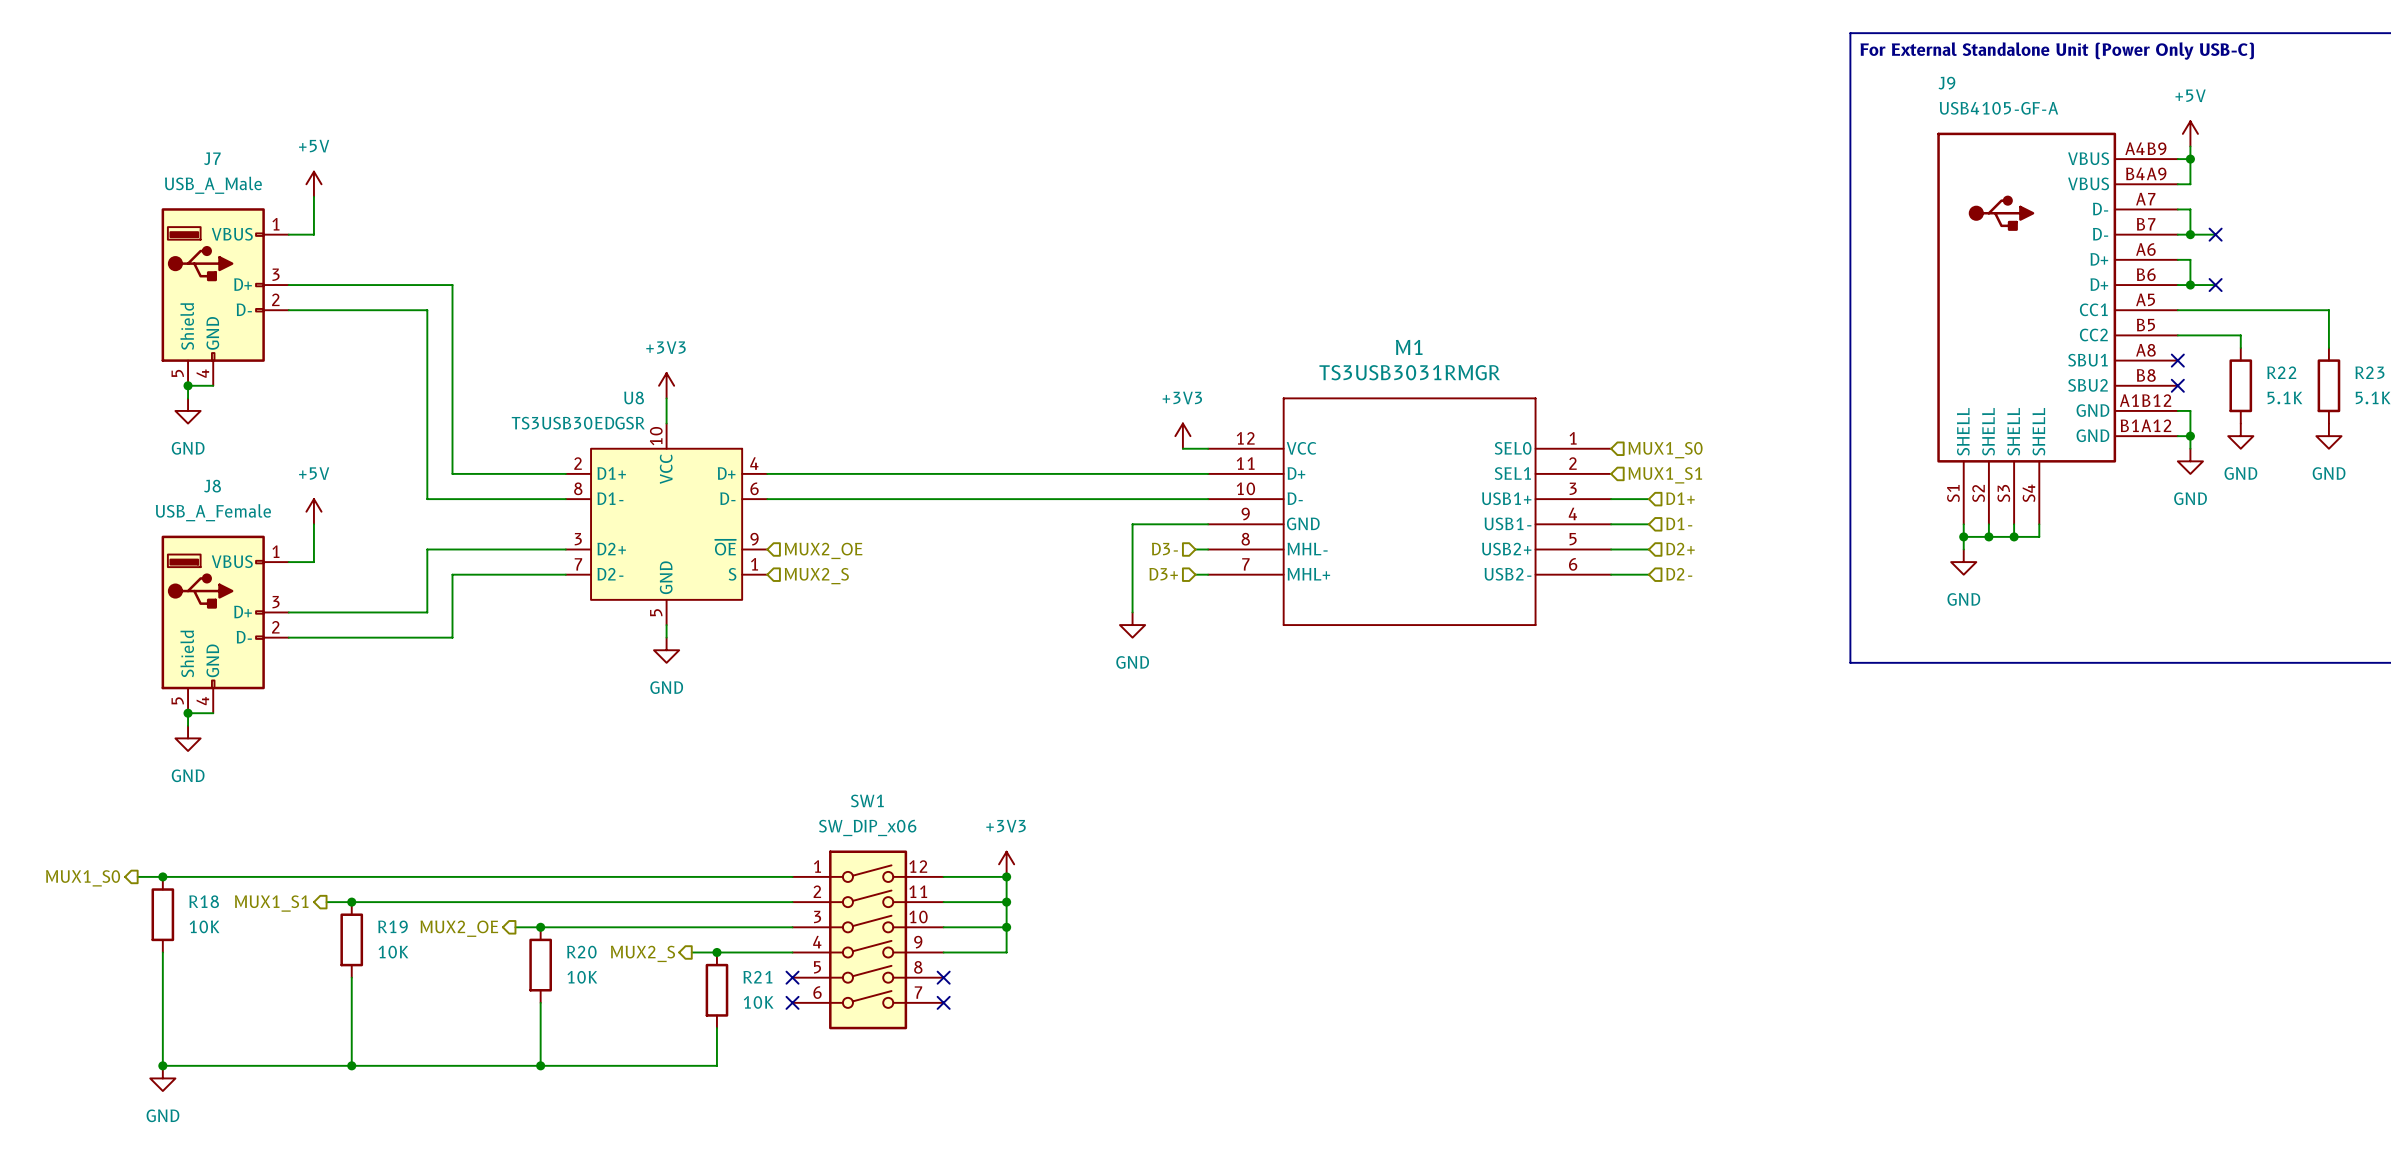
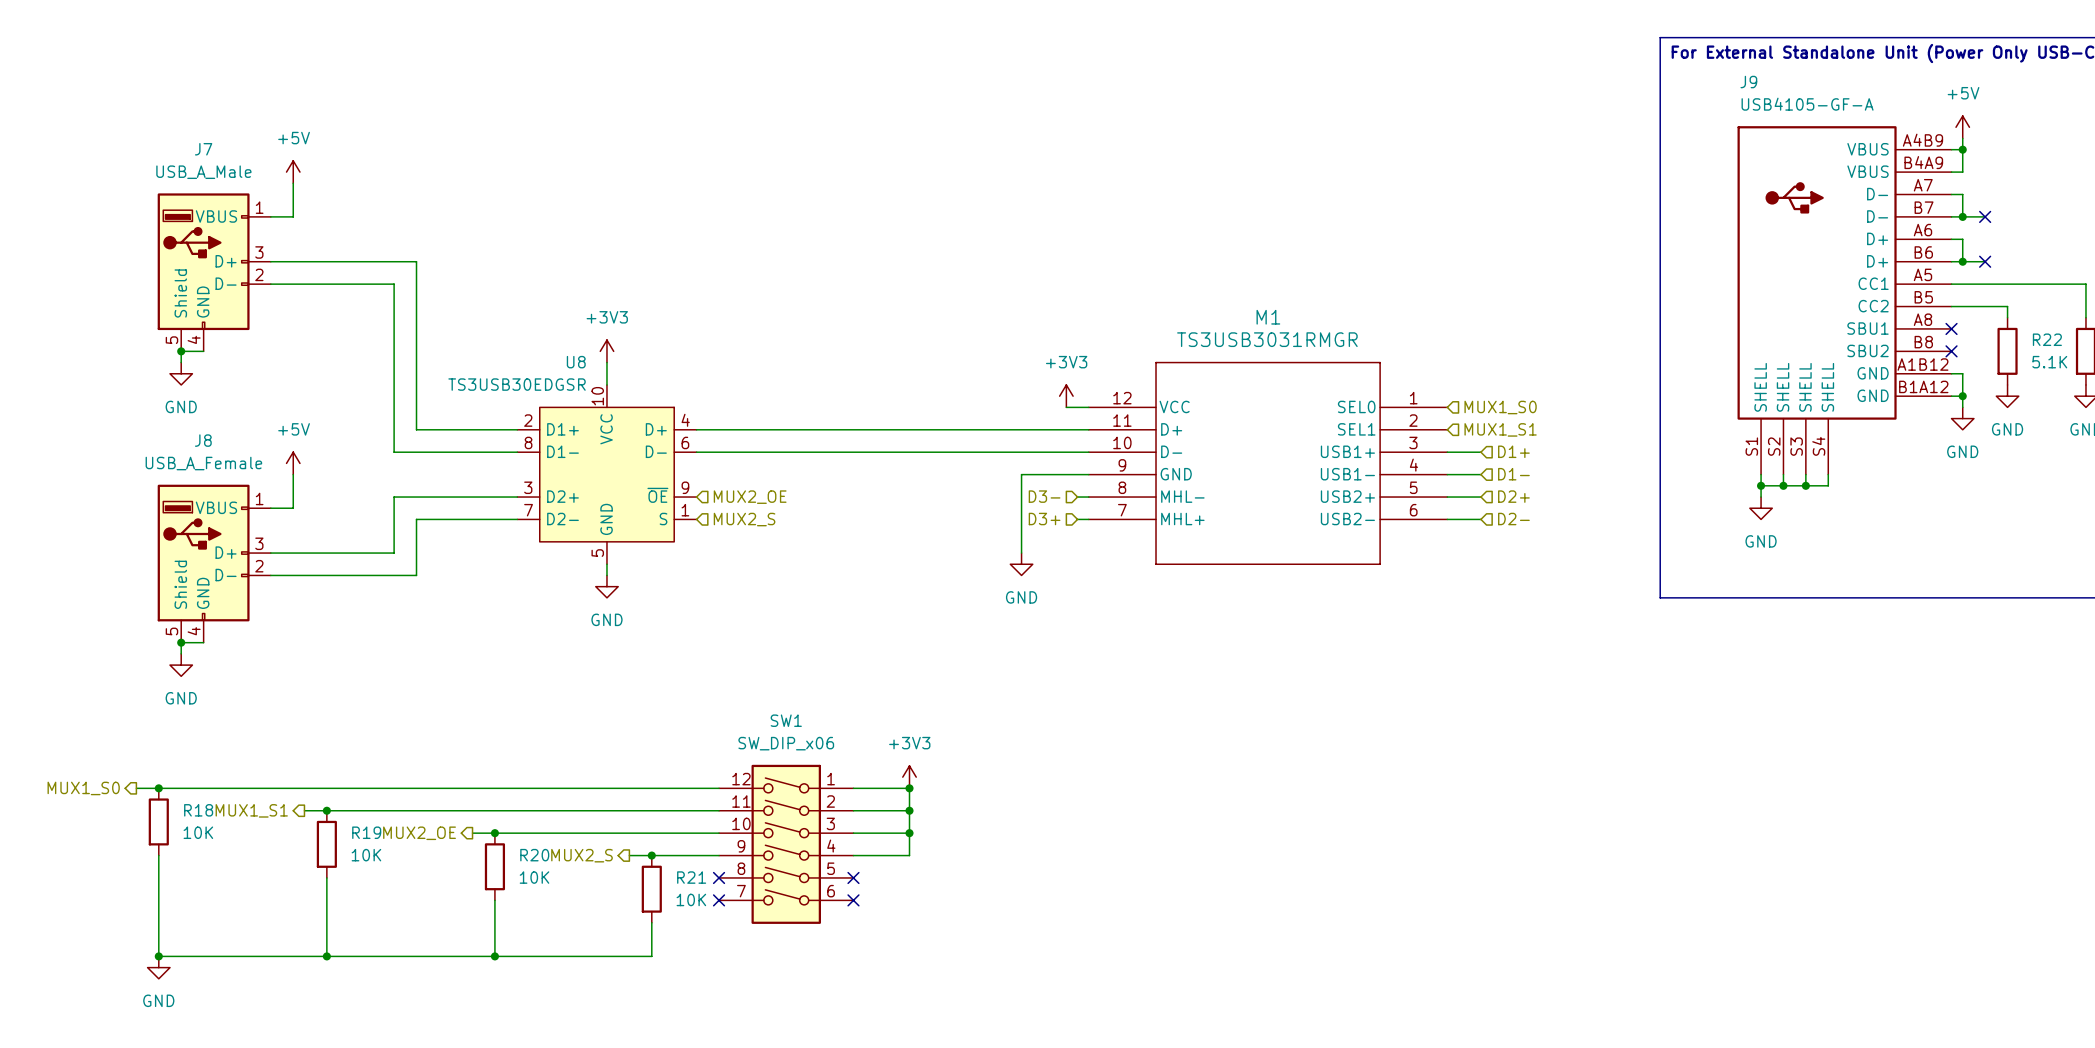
SW1 flip: as is (868, 939) -> left-right (786, 844)

